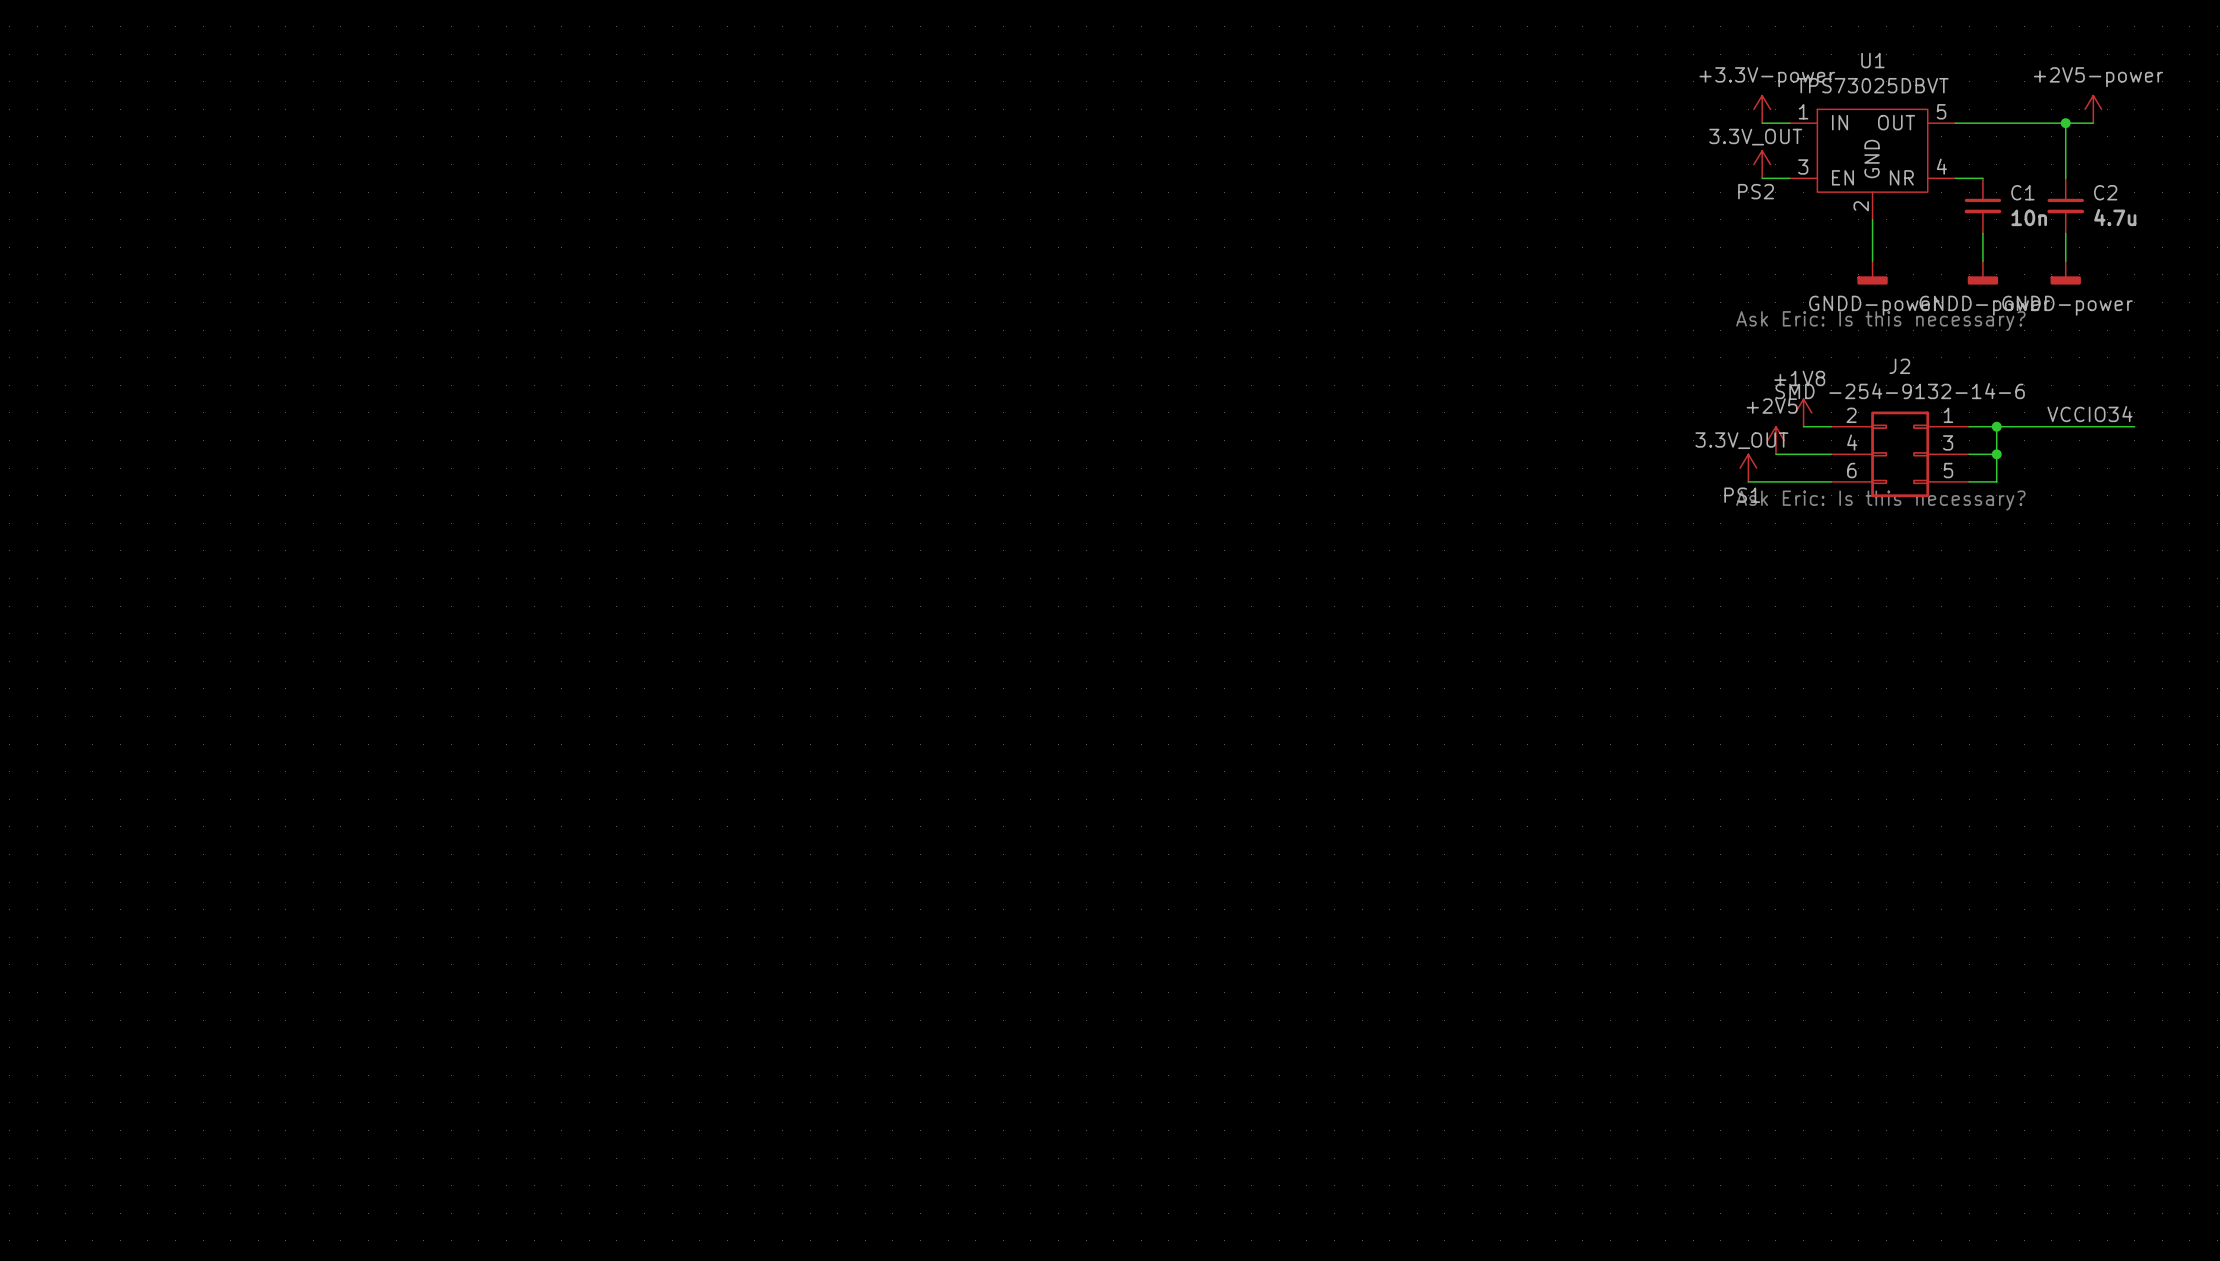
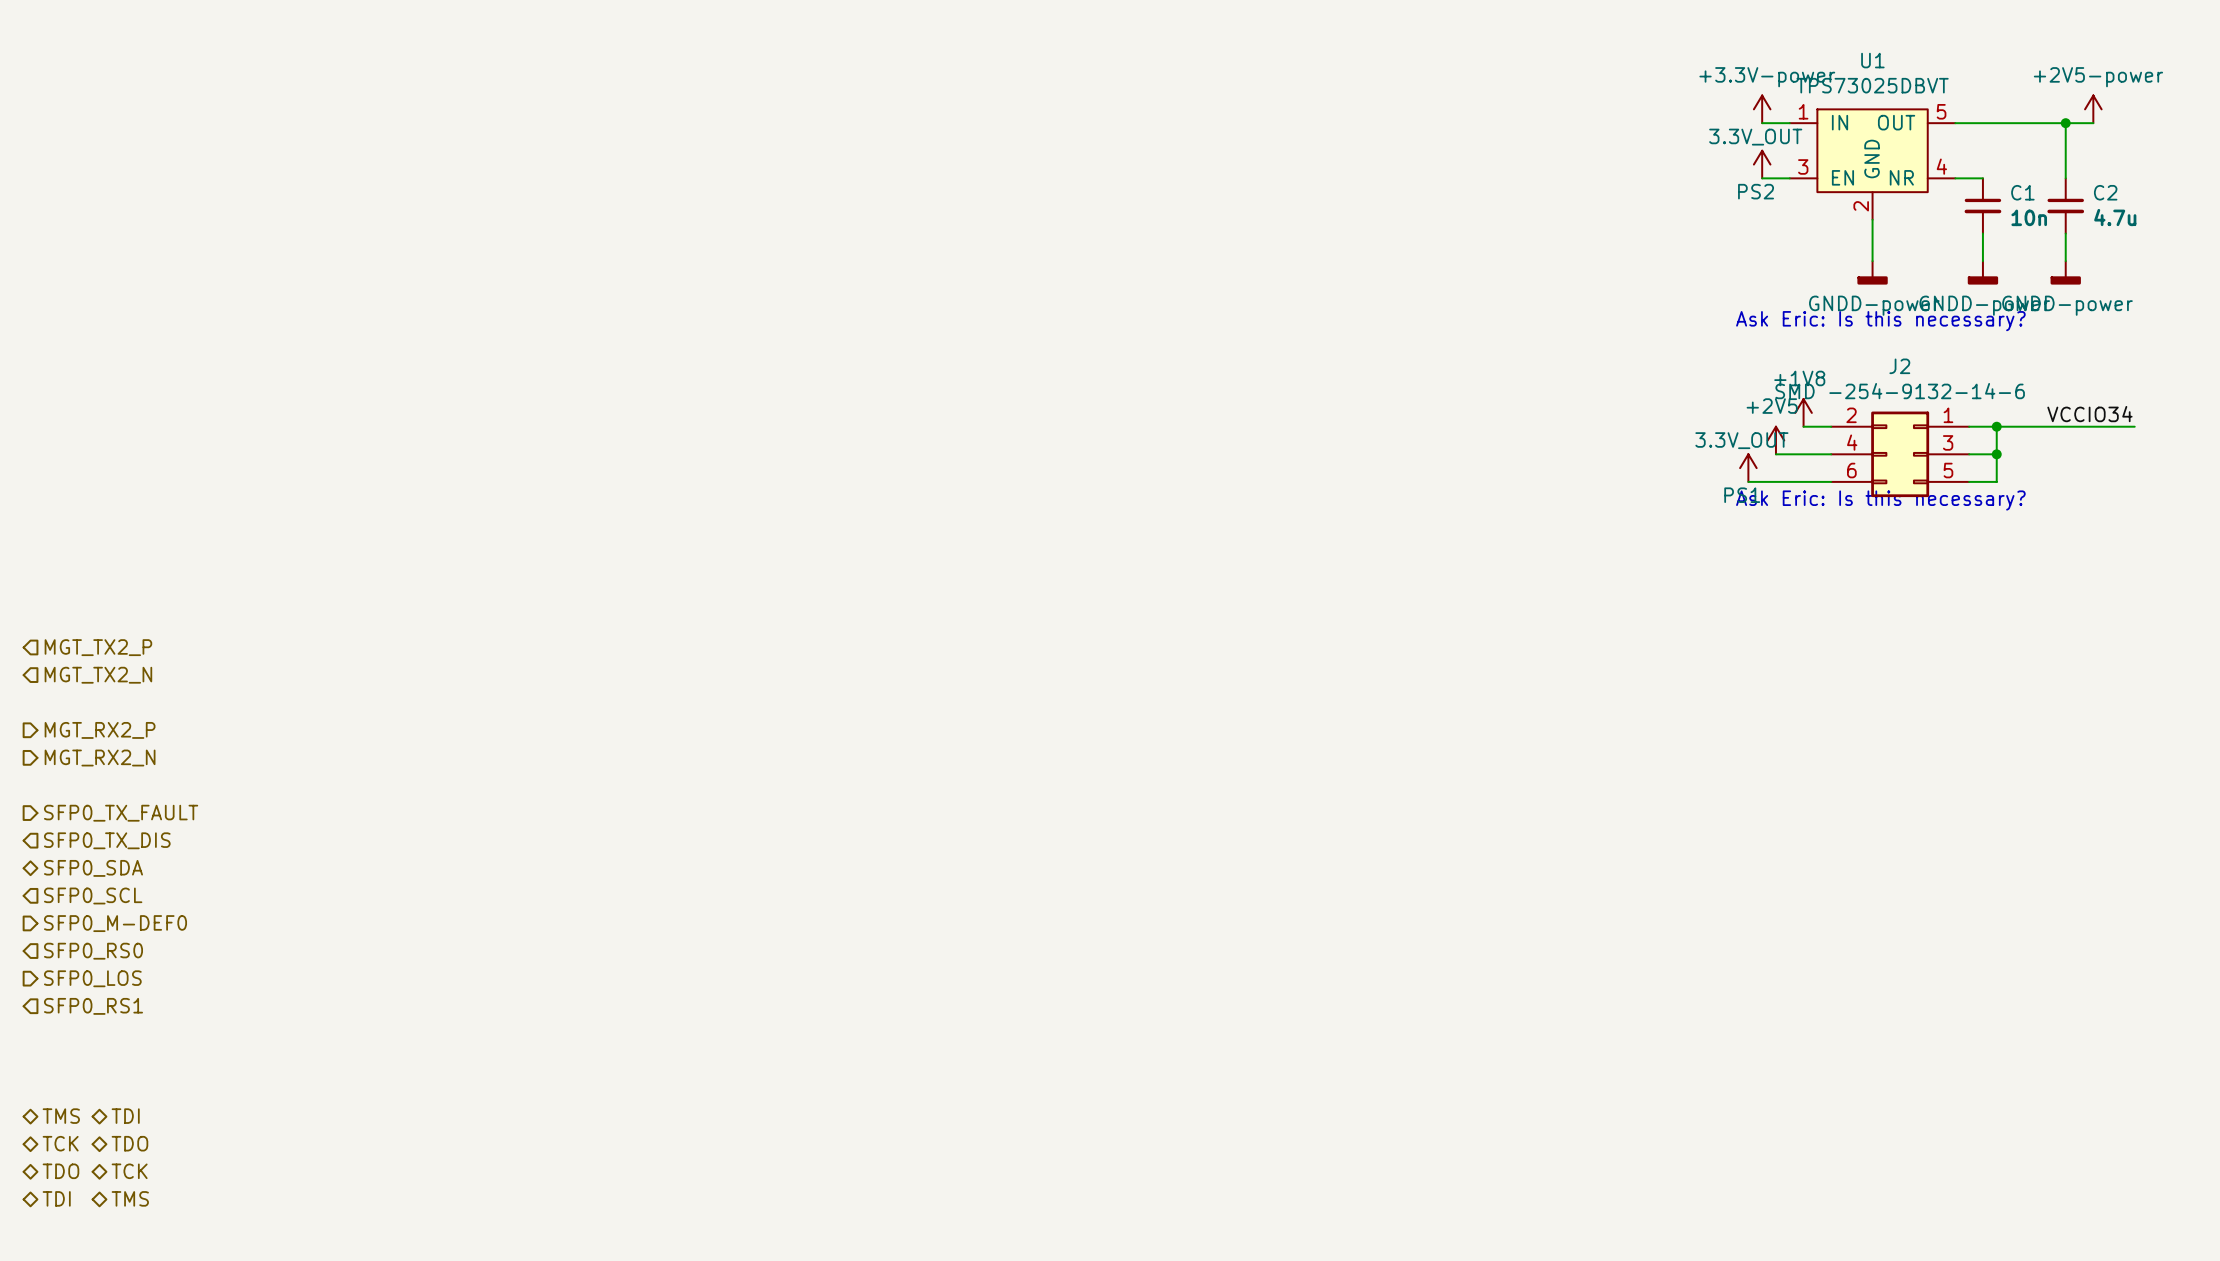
hierarchical label: none -> MGT_TX2_P (98, 647)
hierarchical label: none -> MGT_TX2_N (98, 675)
hierarchical label: none -> MGT_RX2_P (100, 730)
hierarchical label: none -> MGT_RX2_N (100, 758)
hierarchical label: none -> SFP0_TX_FAULT (121, 813)
hierarchical label: none -> SFP0_TX_DIS (107, 840)
hierarchical label: none -> SFP0_SDA (93, 868)
hierarchical label: none -> SFP0_SCL (93, 895)
hierarchical label: none -> SFP0_M-DEF0 (115, 923)
hierarchical label: none -> SFP0_RS0 (93, 951)
hierarchical label: none -> SFP0_LOS (92, 978)
hierarchical label: none -> SFP0_RS1 (93, 1006)
hierarchical label: none -> TMS (61, 1116)
hierarchical label: none -> TDI (125, 1116)
hierarchical label: none -> TCK (60, 1143)
hierarchical label: none -> TDO (129, 1143)
hierarchical label: none -> TDO (60, 1171)
hierarchical label: none -> TCK (129, 1171)
hierarchical label: none -> TDI (56, 1198)
hierarchical label: none -> TMS (130, 1198)

